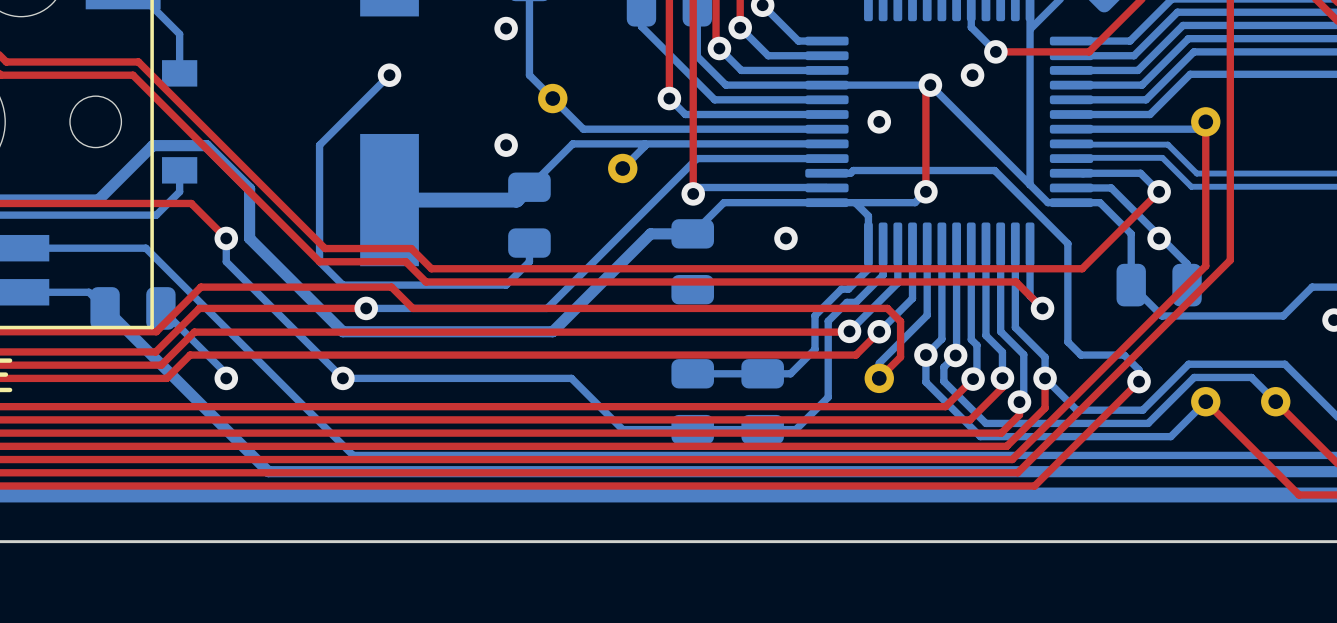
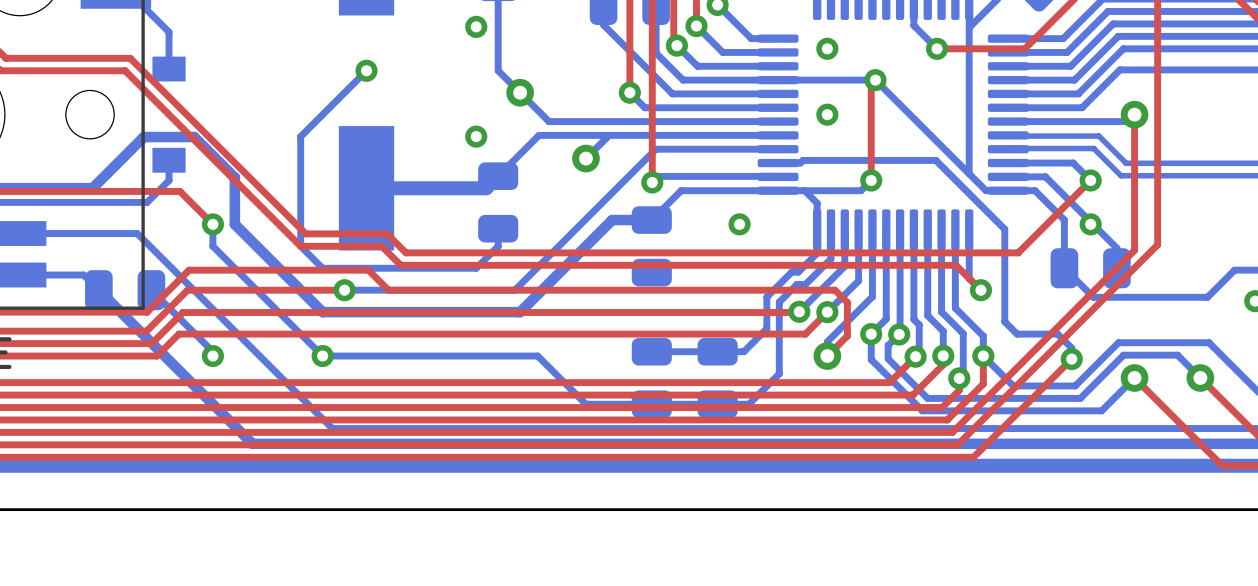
via position: (972, 75) -> (827, 48)

